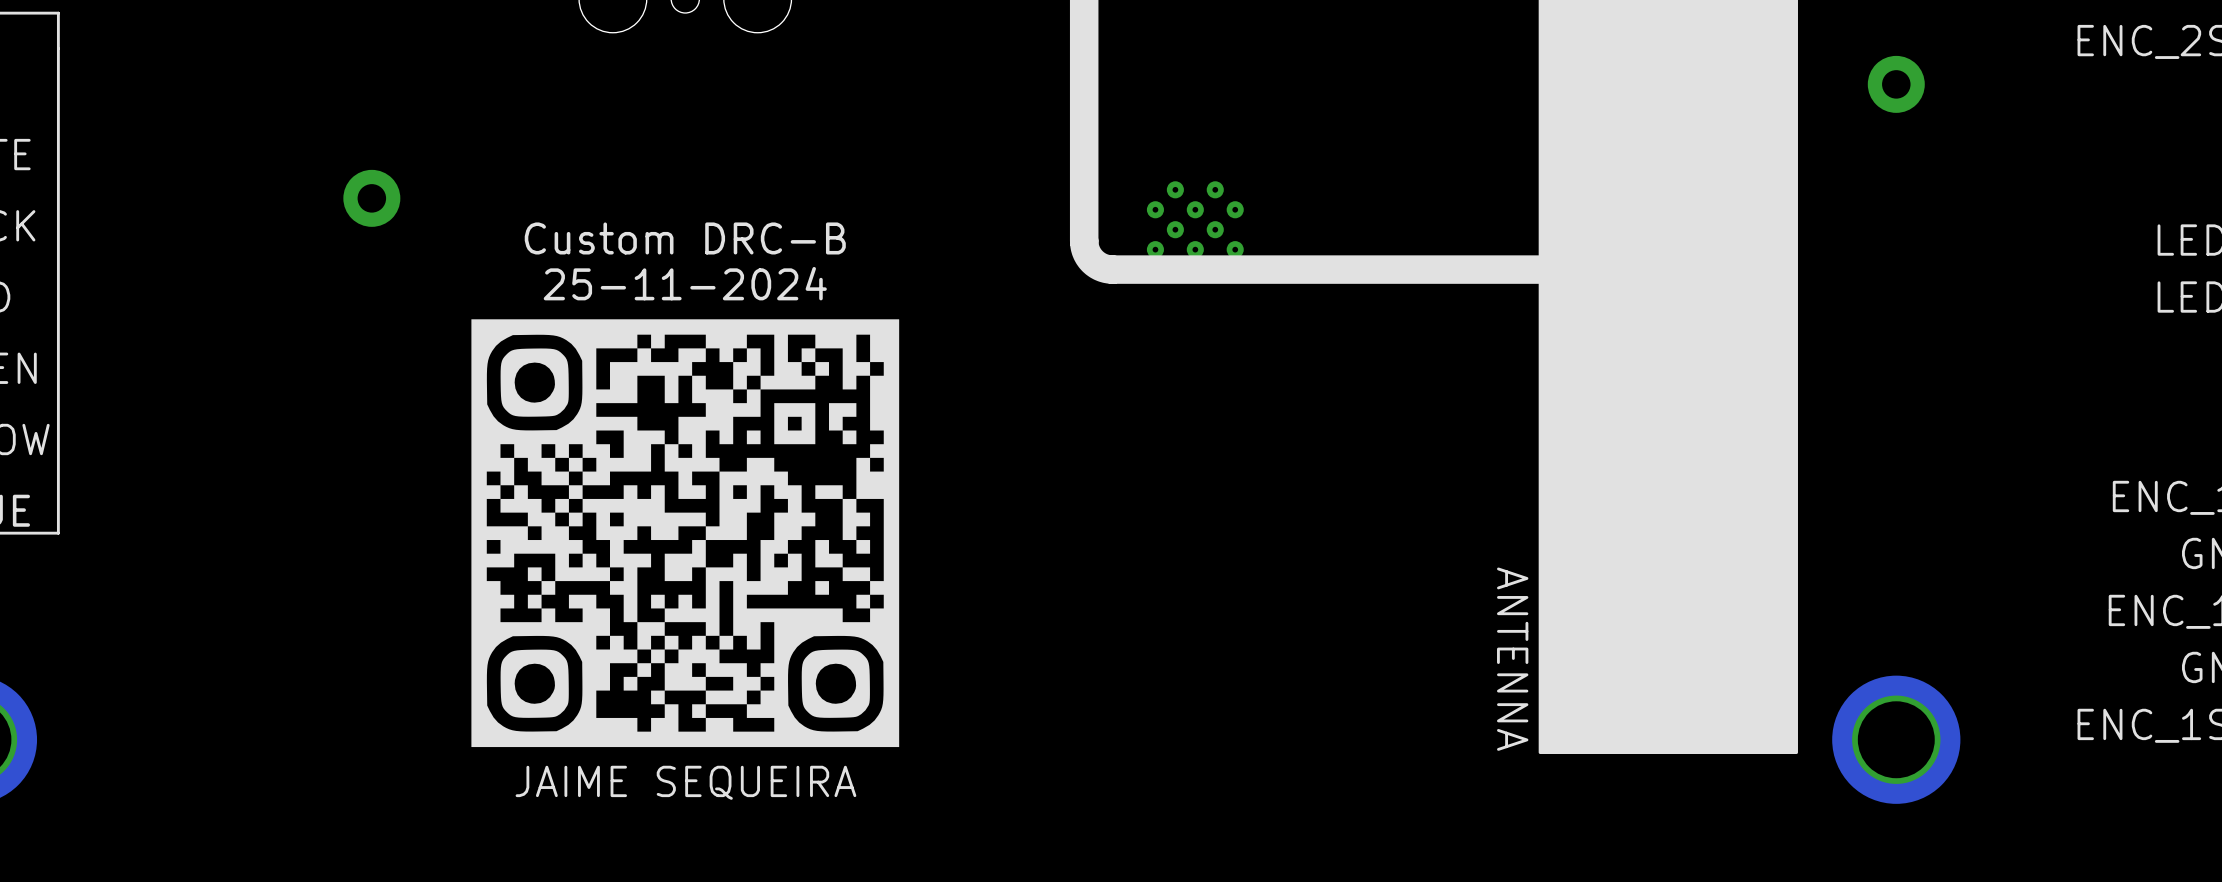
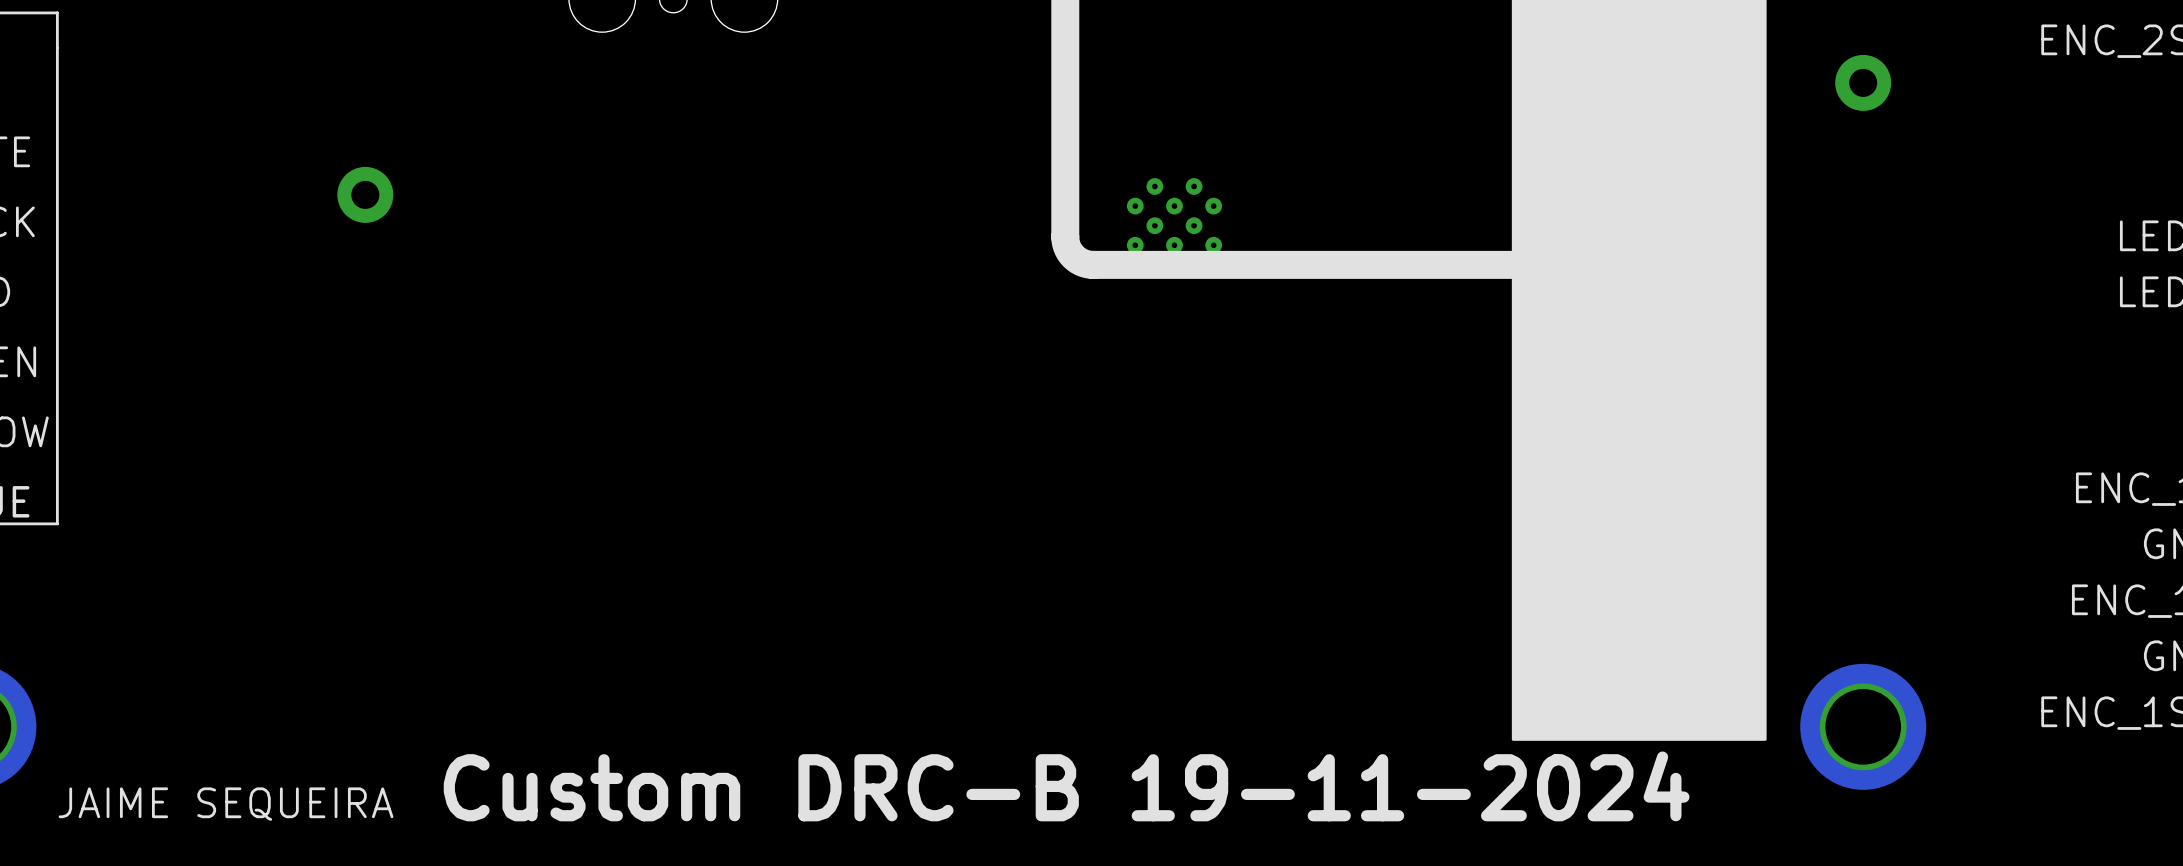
text: Custom DRC-B (685, 238) -> none
text: 25-11-2024 (685, 283) -> none
drawing: [471, 319, 900, 748] -> none
text: ANTENNA (1512, 659) -> none
text position: JAIME SEQUEIRA (685, 782) -> JAIME SEQUEIRA (226, 804)
text: none -> Custom DRC-B 19-11-2024 (1066, 786)

